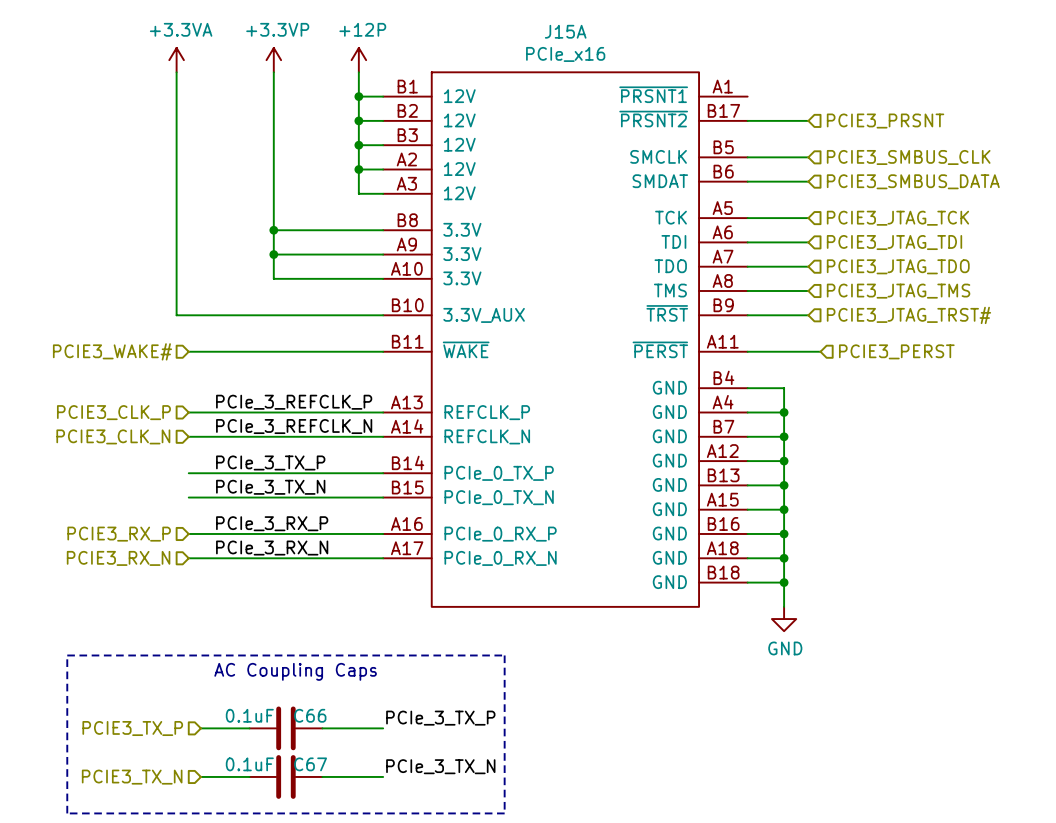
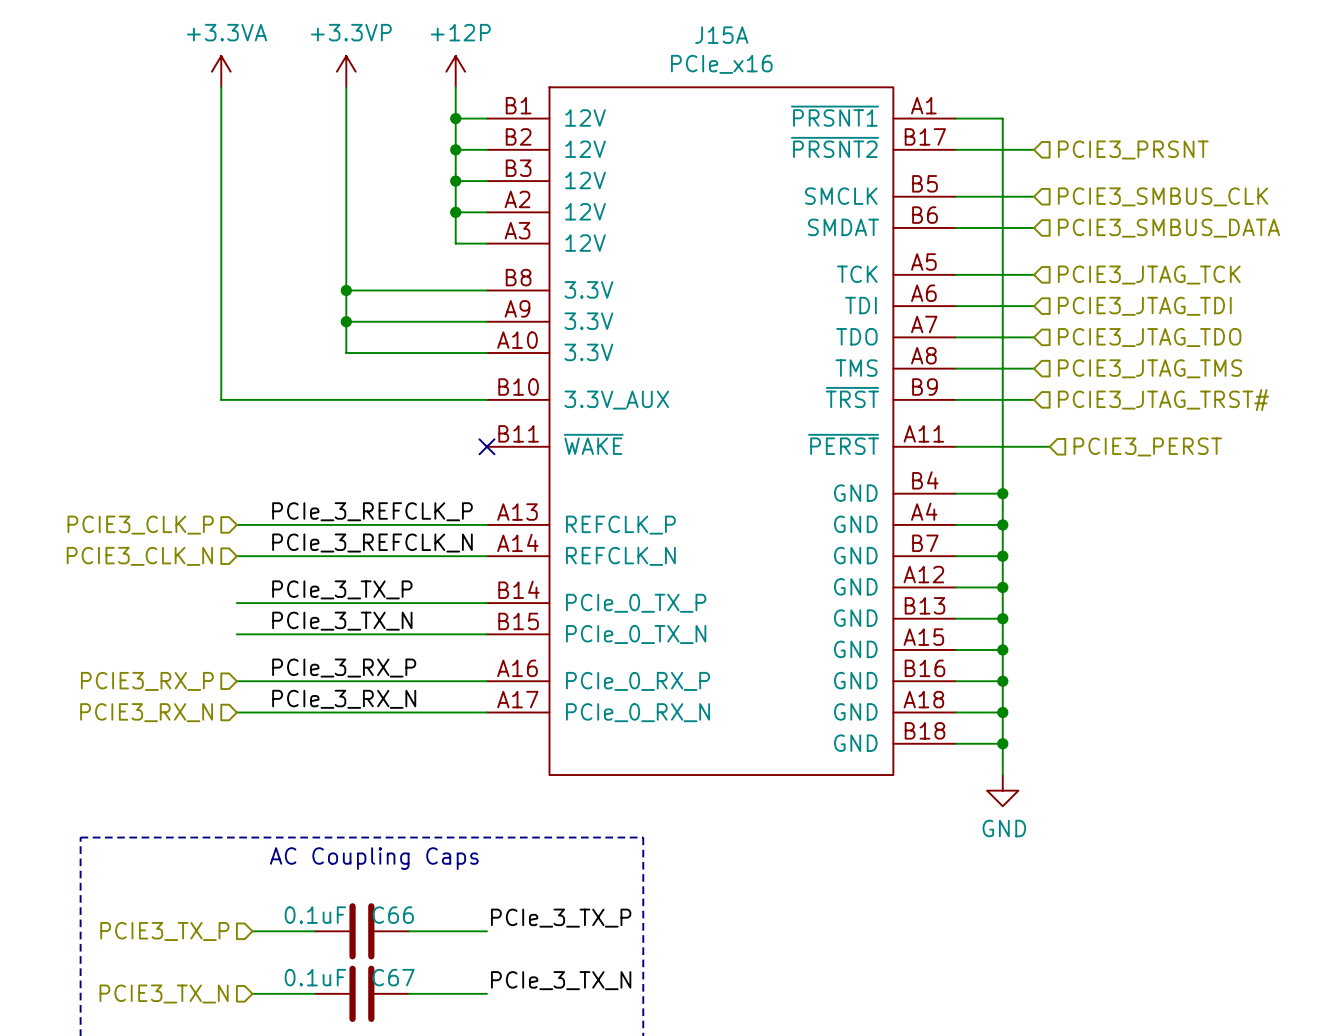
wire: none -> (955, 118) (1002, 118) (1002, 493)
hierarchical label: PCIE3_WAKE# (112, 351) -> none
wire: (188, 351) (383, 351) -> none
no-connect mark: none -> (486, 446)
junction: none -> (1002, 493)

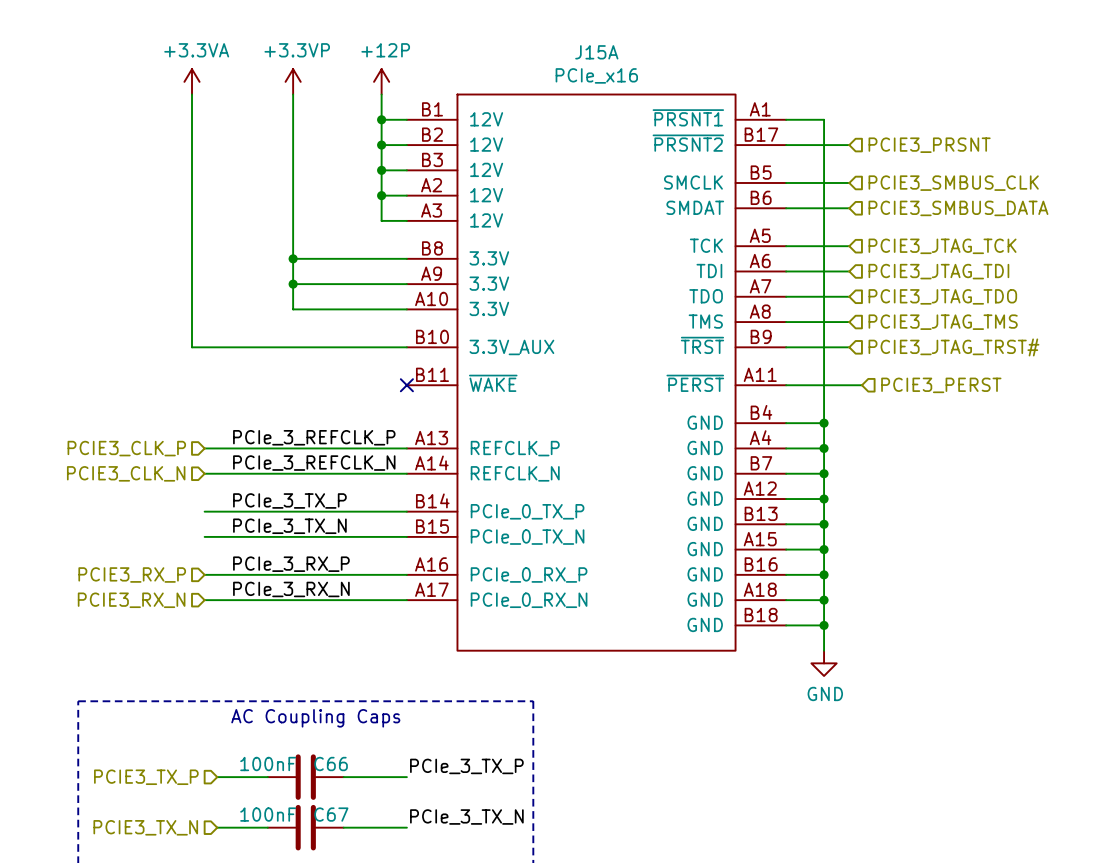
C66 value: 0.1uF (315, 915) -> 100nF (268, 764)
C67 value: 0.1uF (315, 977) -> 100nF (268, 814)

